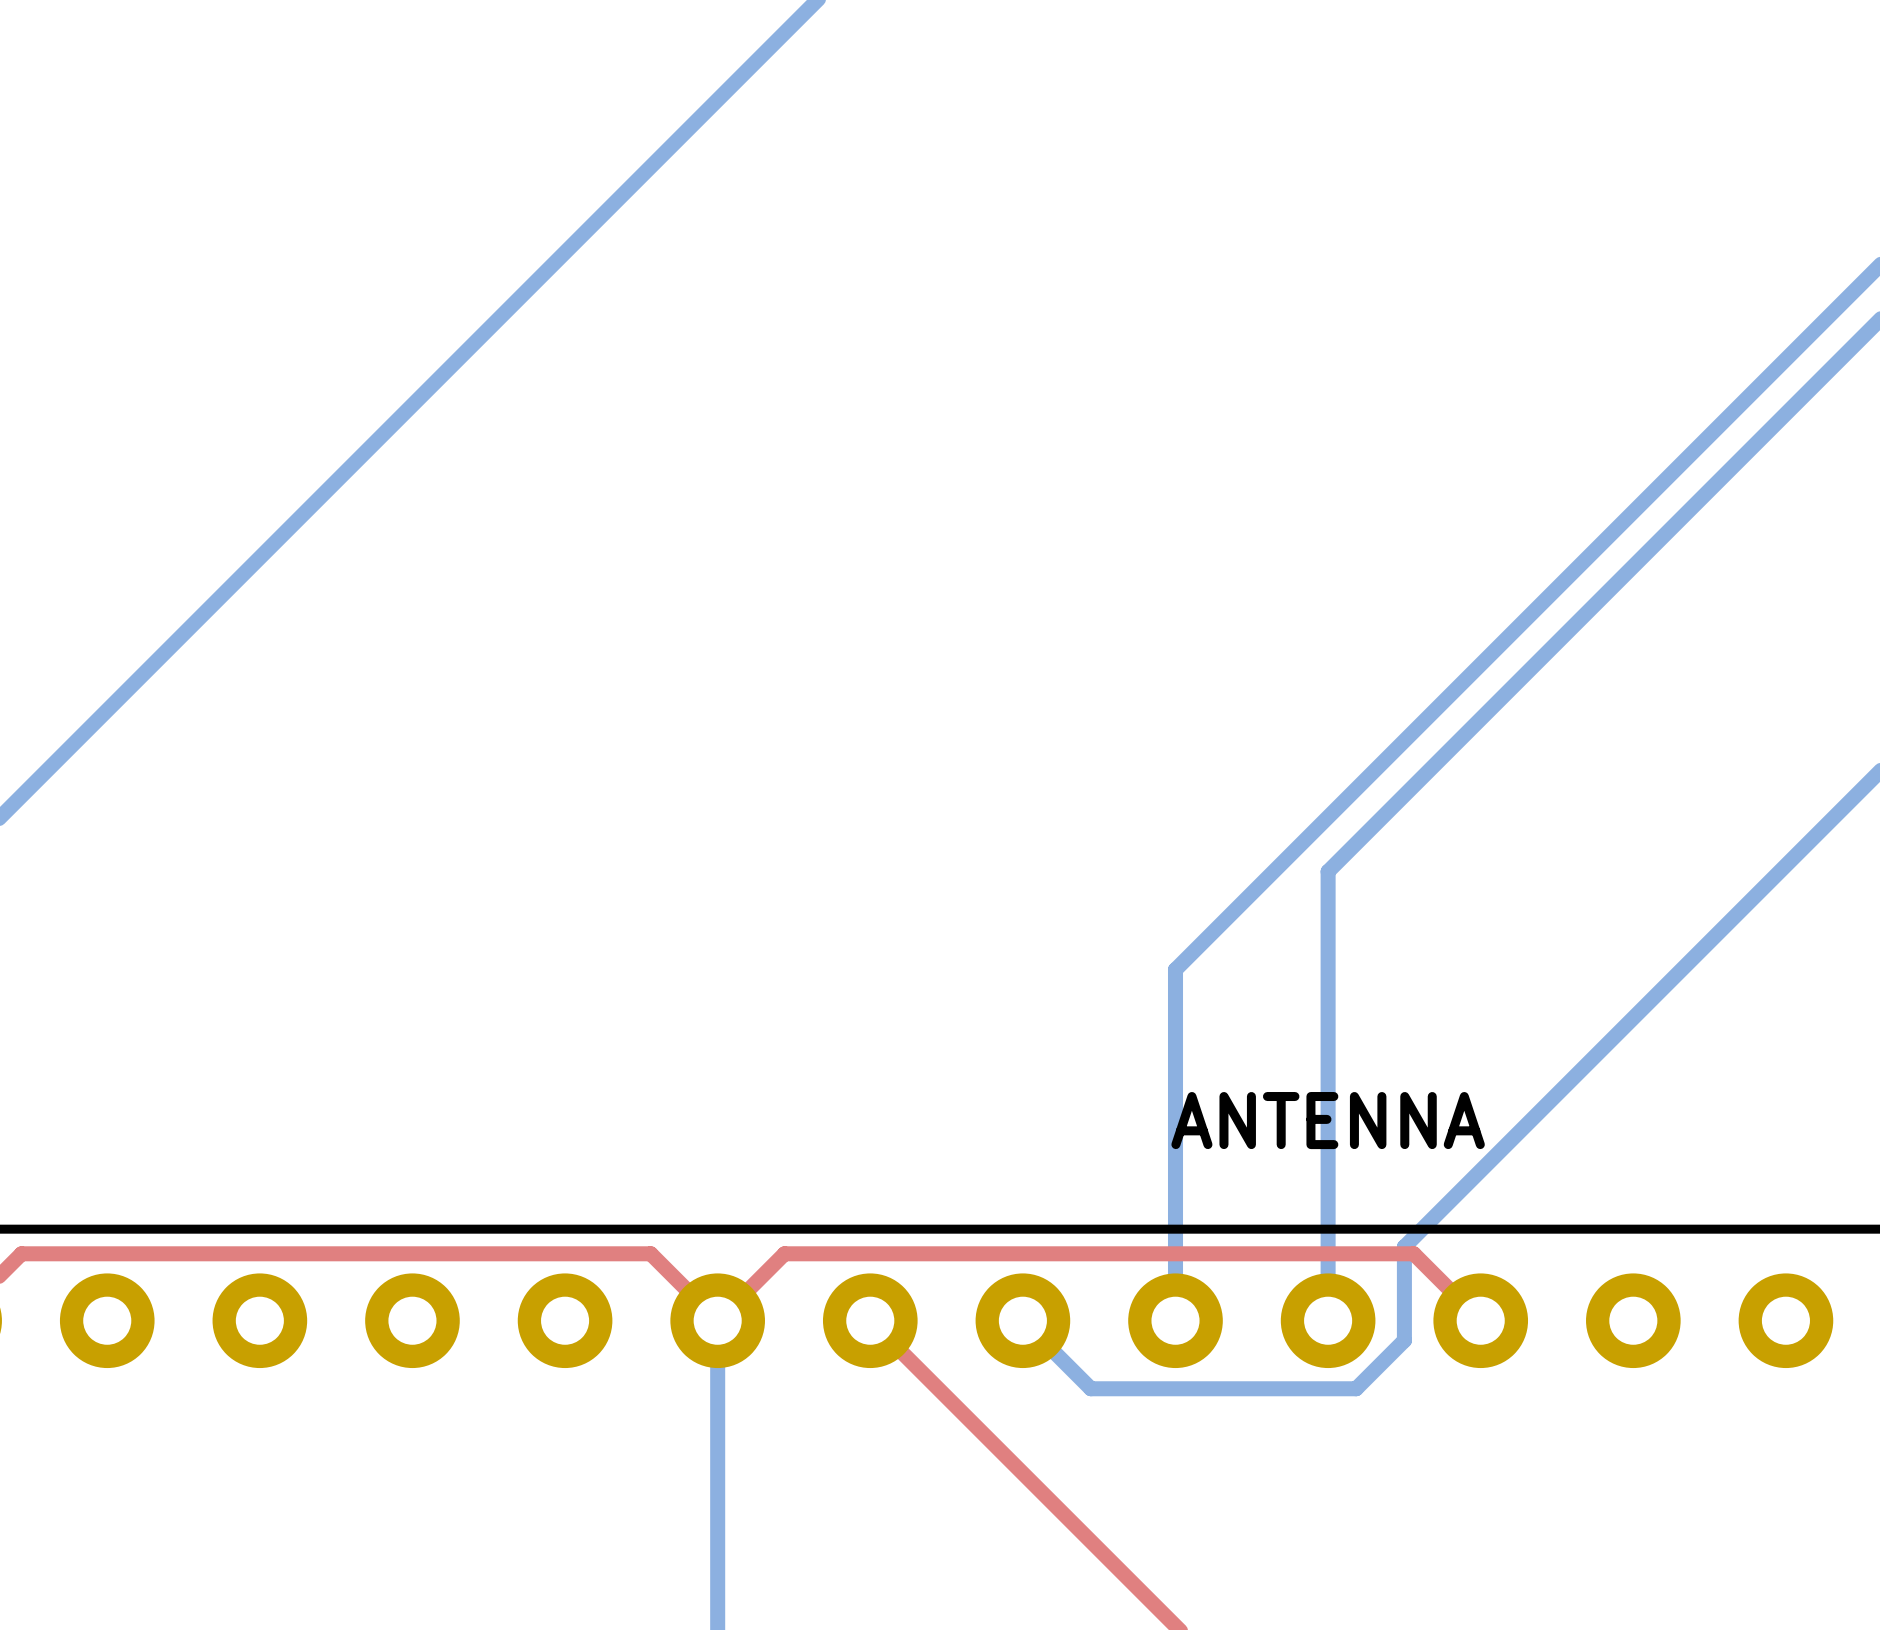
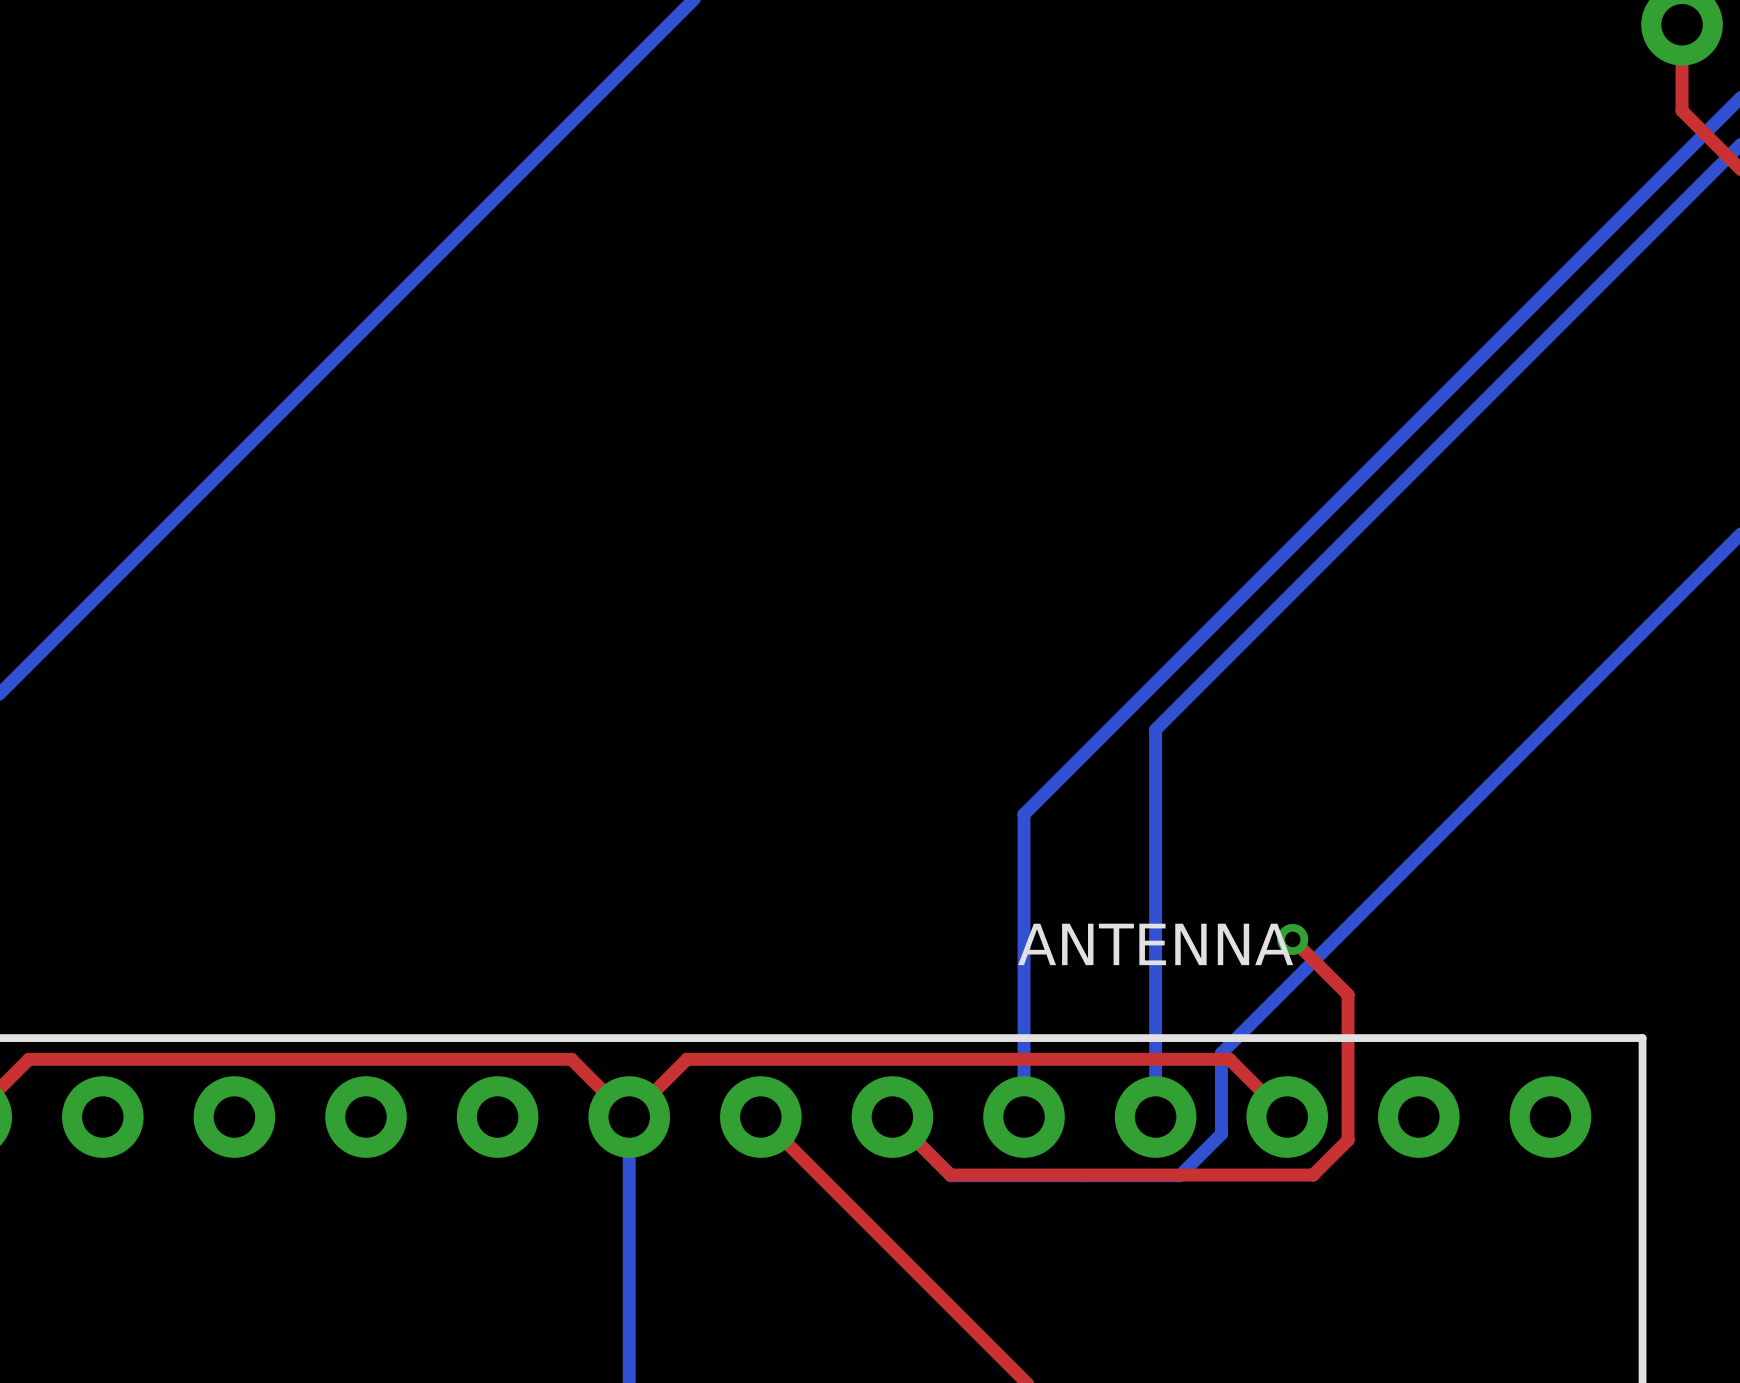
top track: none -> (1292, 939) (1348, 994) (1348, 1140) (1313, 1175) (950, 1175) (892, 1117)
via: none -> (1292, 939)

